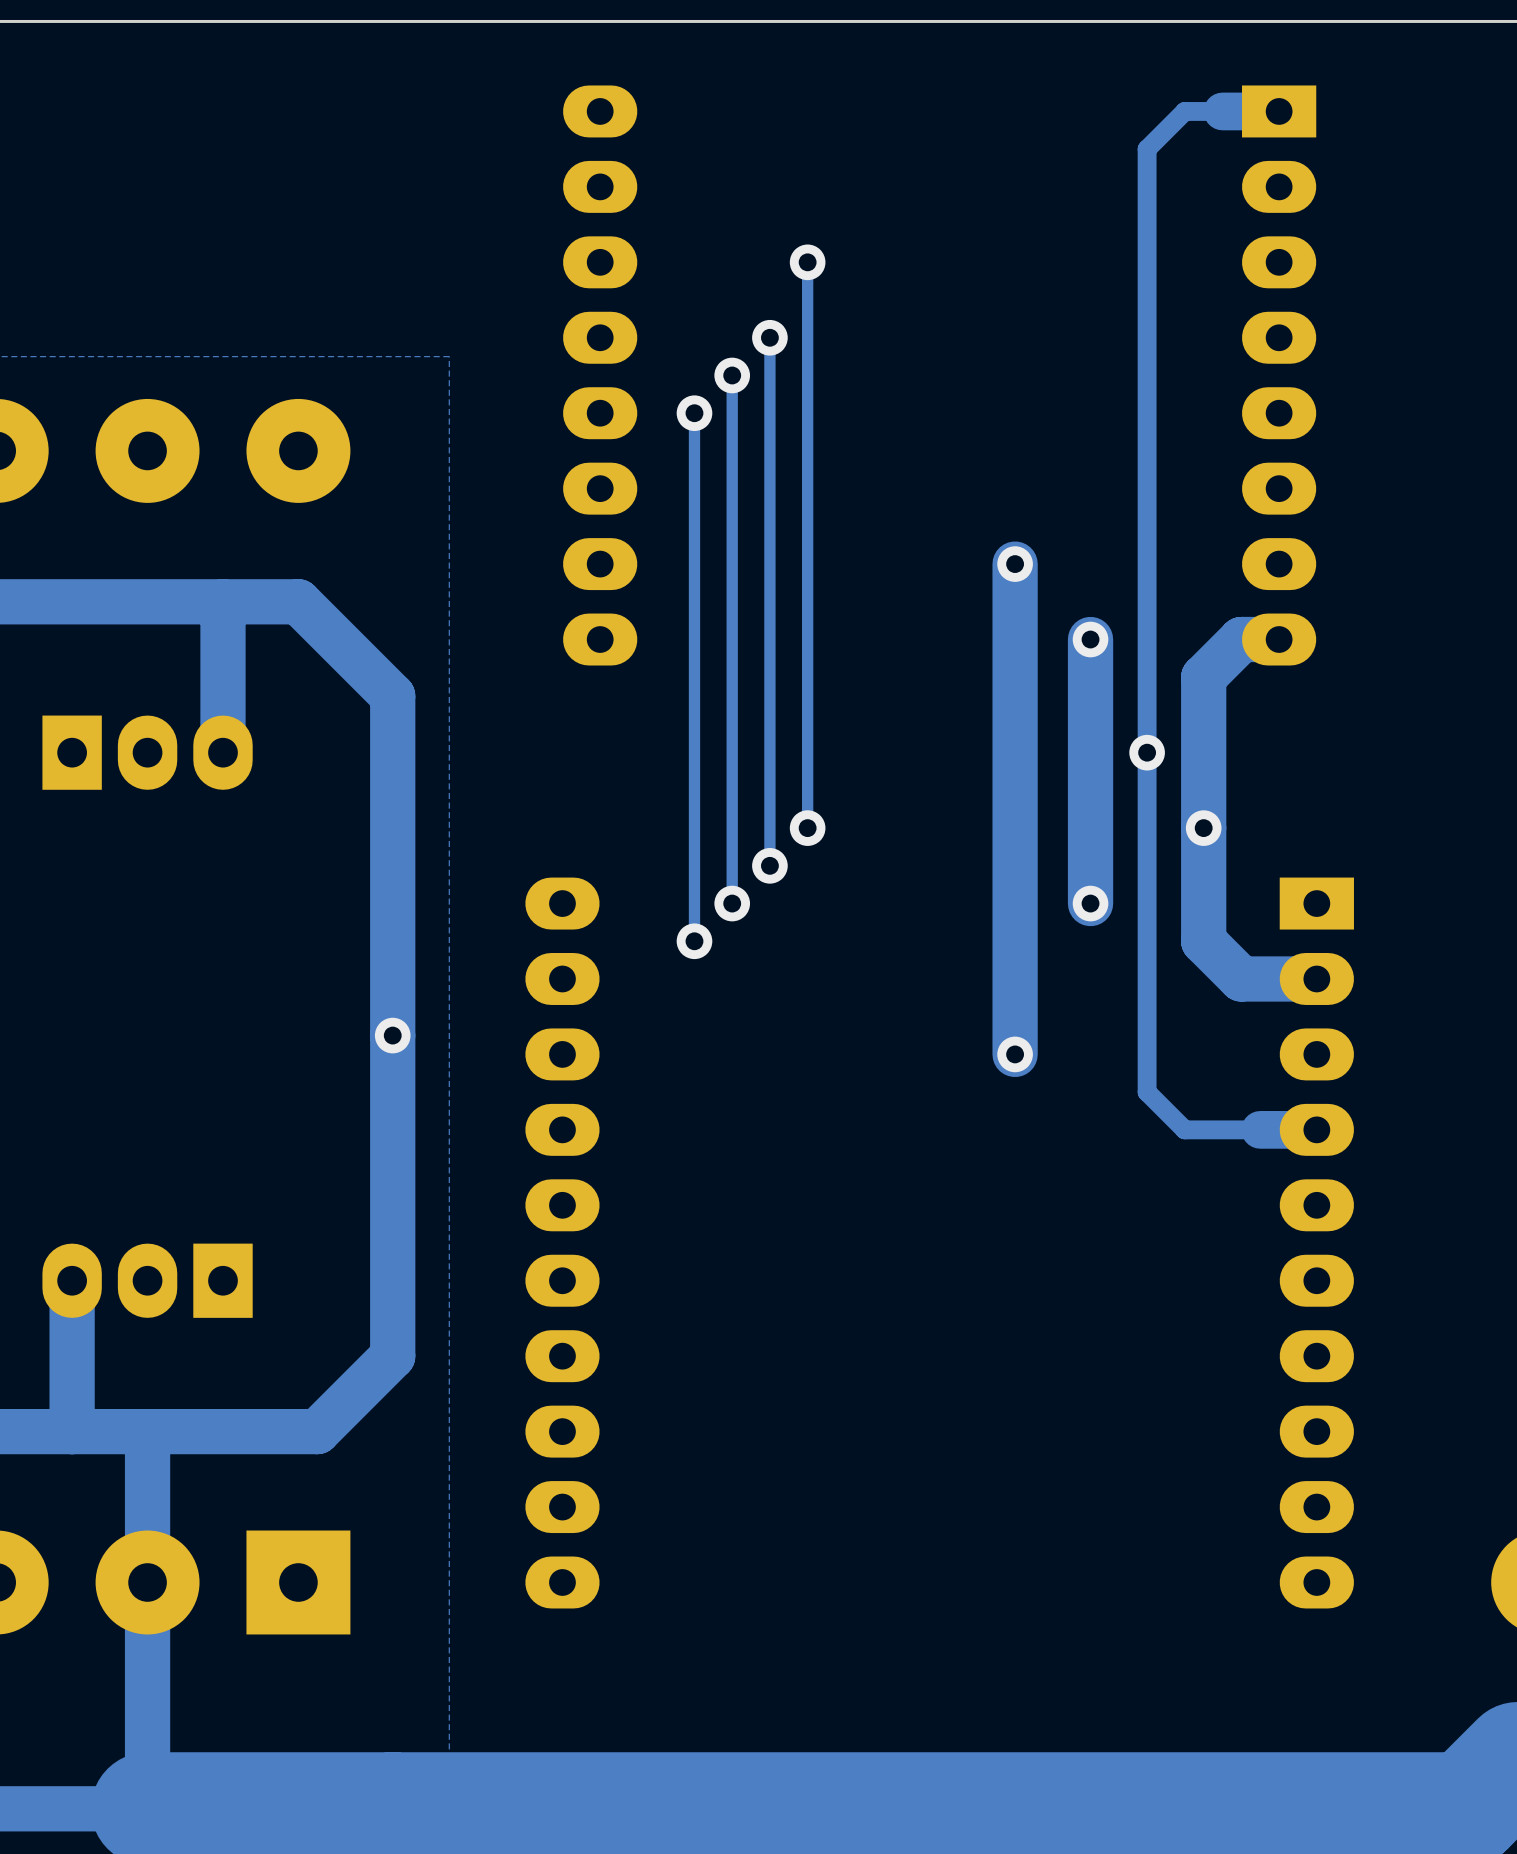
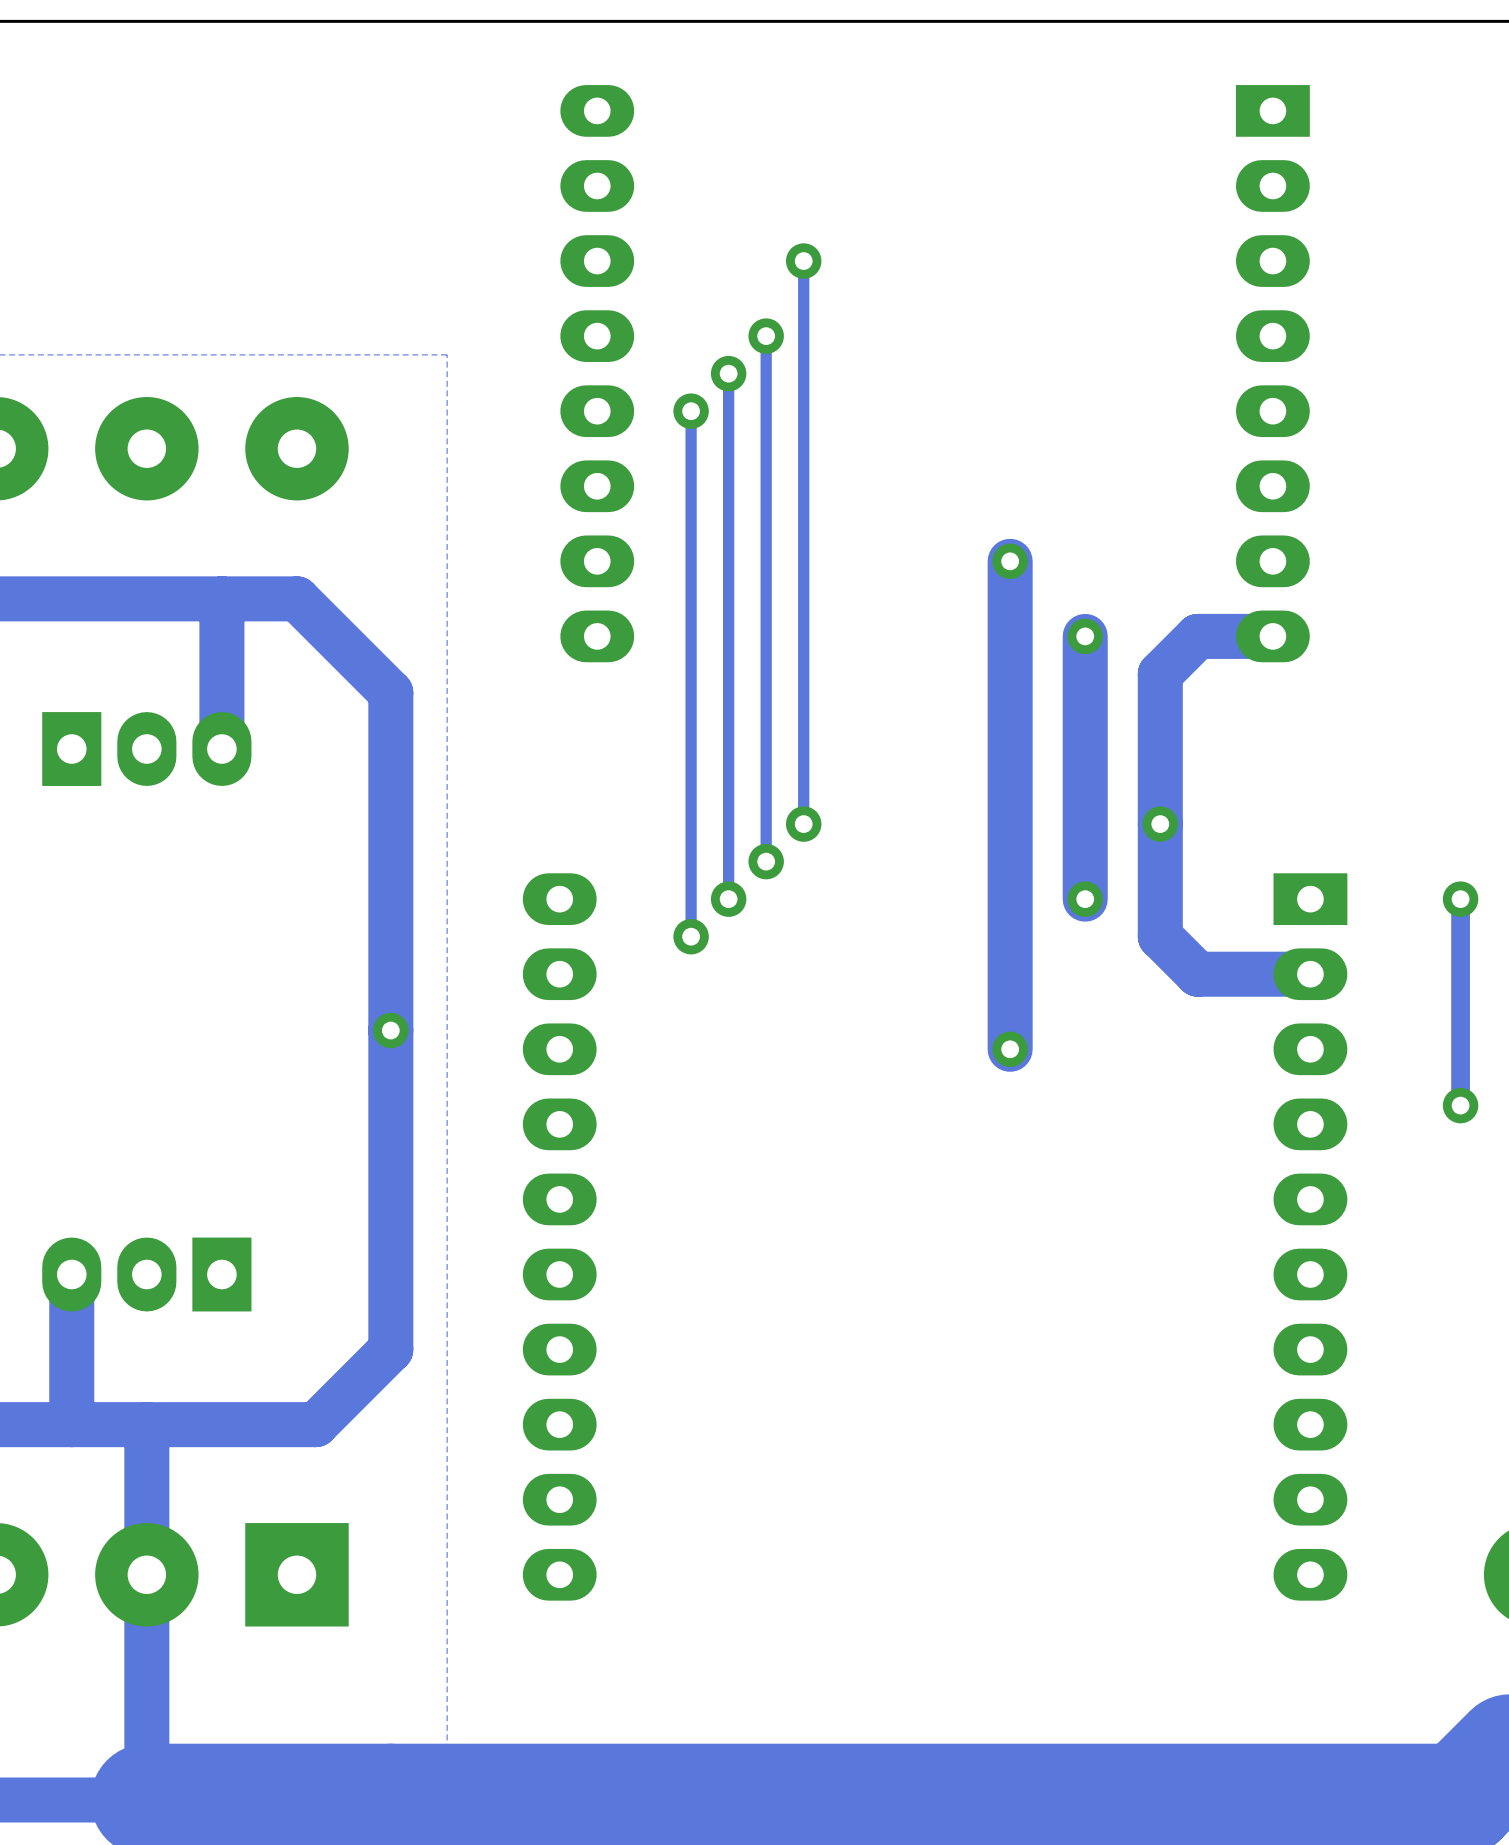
track: (1279, 111) (1184, 111) (1147, 149) (1147, 1092) (1184, 1129) (1316, 1129) -> none
track: (1241, 639) (1203, 677) (1203, 941) (1241, 978) -> (1235, 636) (1197, 636) (1160, 673) (1160, 936) (1197, 974) (1235, 974)
via: (1147, 752) -> none
via position: (1203, 828) -> (1160, 824)
track: none -> (1460, 899) (1460, 1105)
via: none -> (1460, 899)
via: none -> (1460, 1105)

